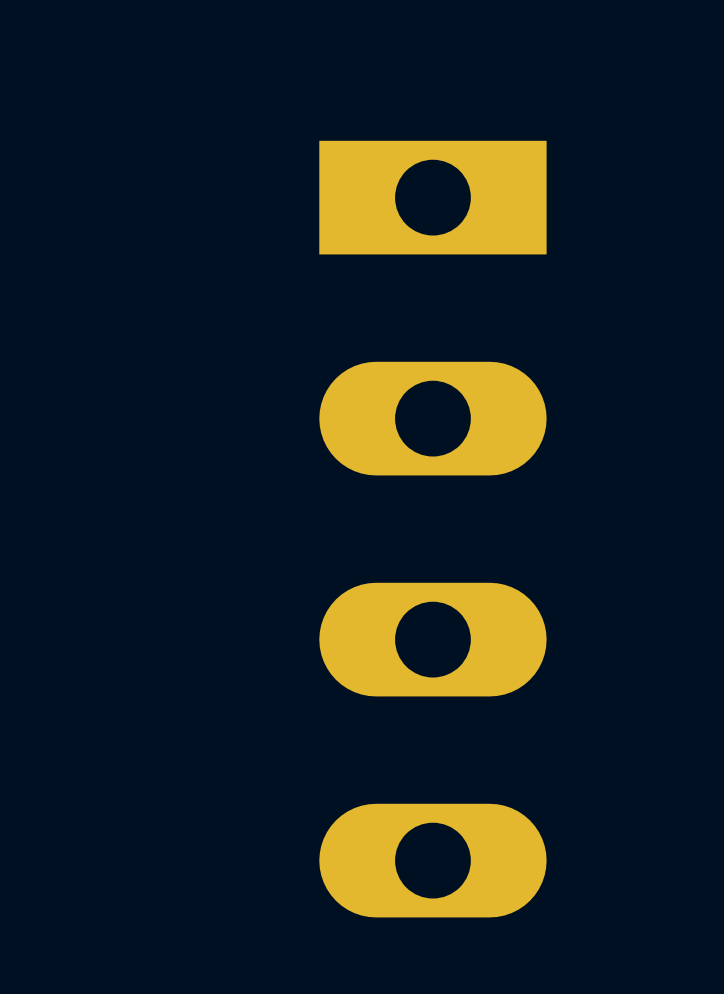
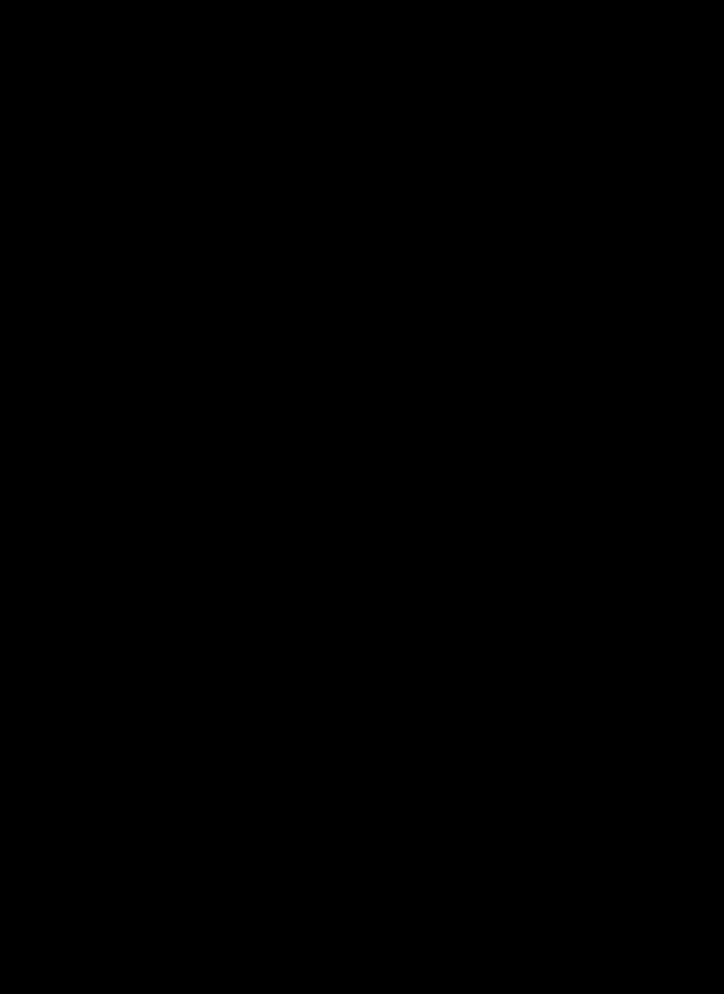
part: (432, 529) -> none

